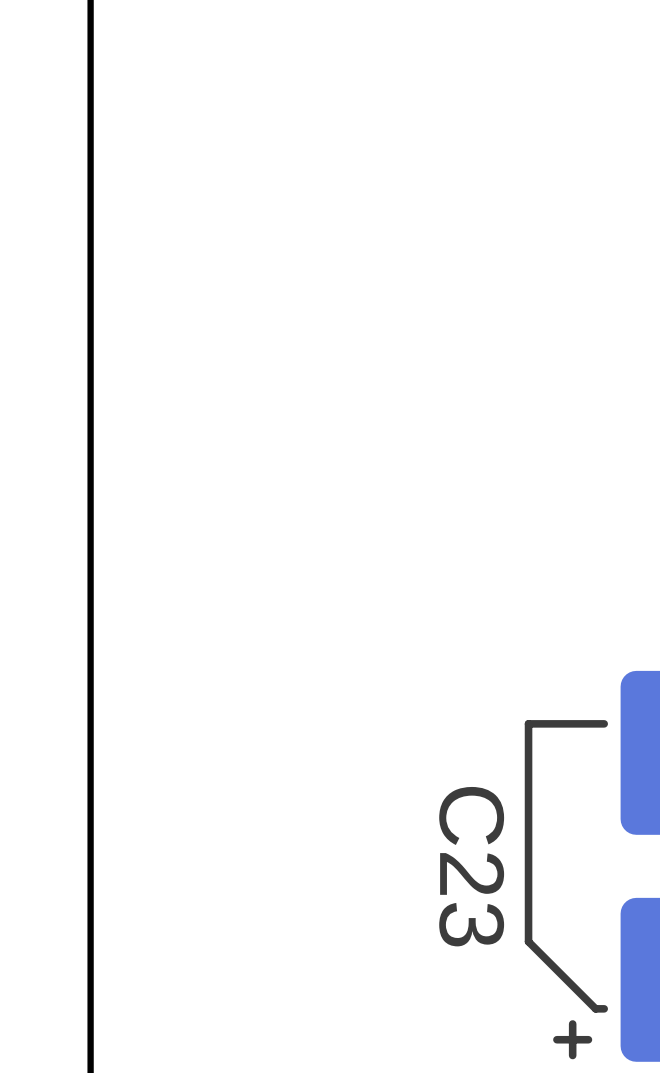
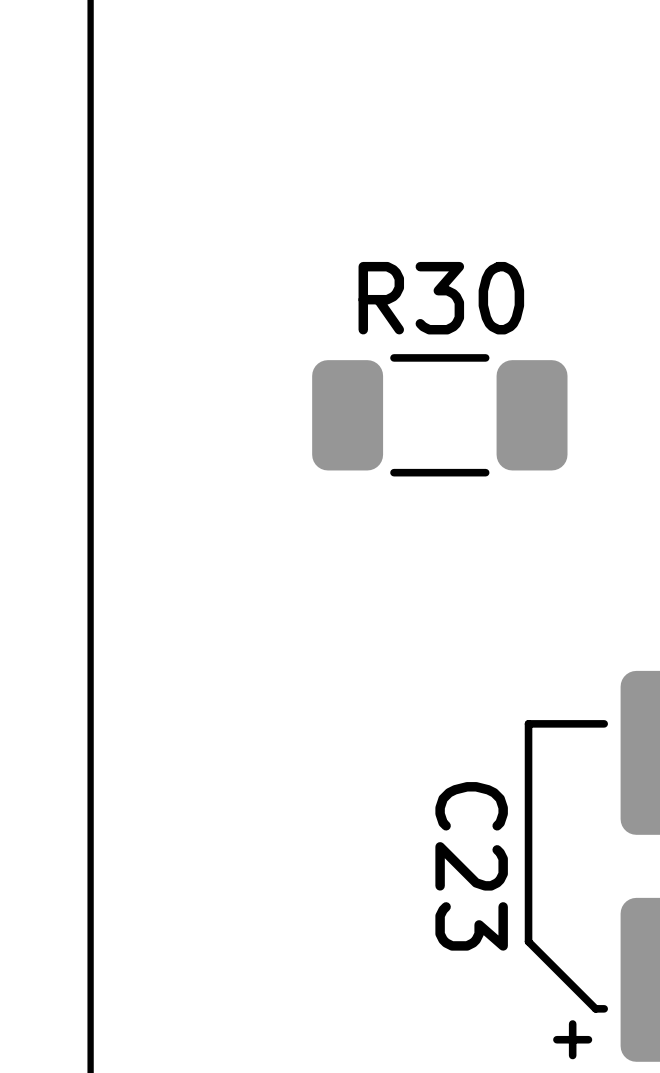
R30: none -> (439, 415)

